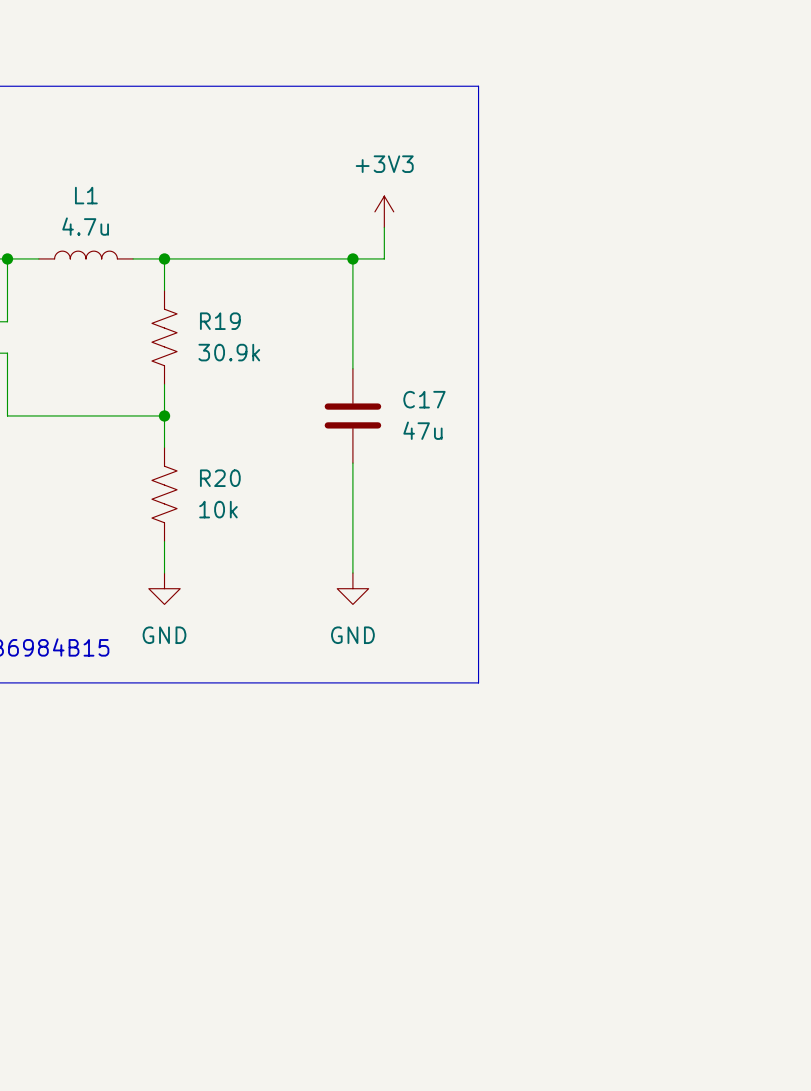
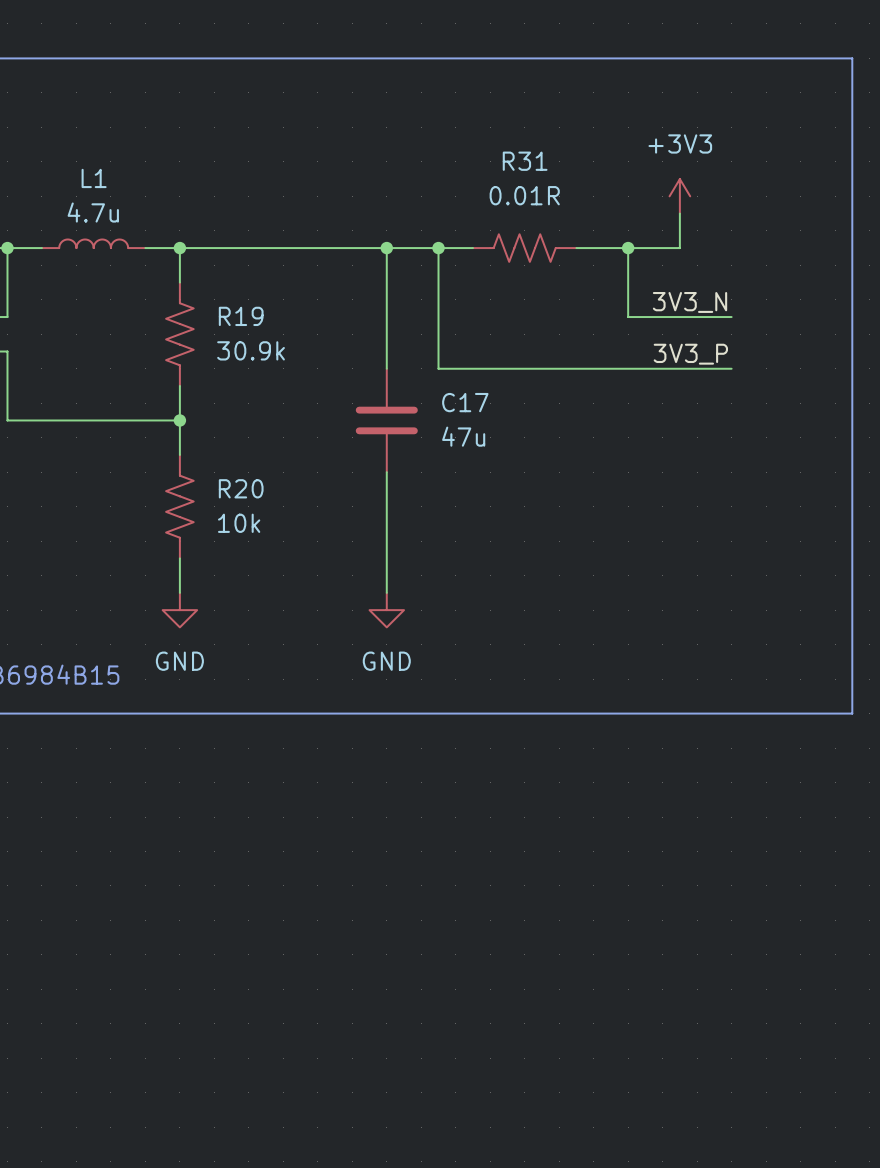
line: (478, 86) (478, 682) -> (524, 58) (852, 58) (852, 713) (524, 713)
power symbol position: +3V3 (384, 211) -> +3V3 (679, 196)
wire: (384, 227) (384, 258) -> (472, 248) (421, 248)
wire: none -> (679, 213) (679, 248) (576, 248)
wire: none -> (438, 248) (438, 368) (731, 368)
junction: none -> (438, 248)
R31: none -> 0.01R (524, 248)
wire: none -> (628, 248) (628, 317) (731, 317)
junction: none -> (628, 248)
label: none -> 3V3_N (690, 302)
label: none -> 3V3_P (690, 354)

